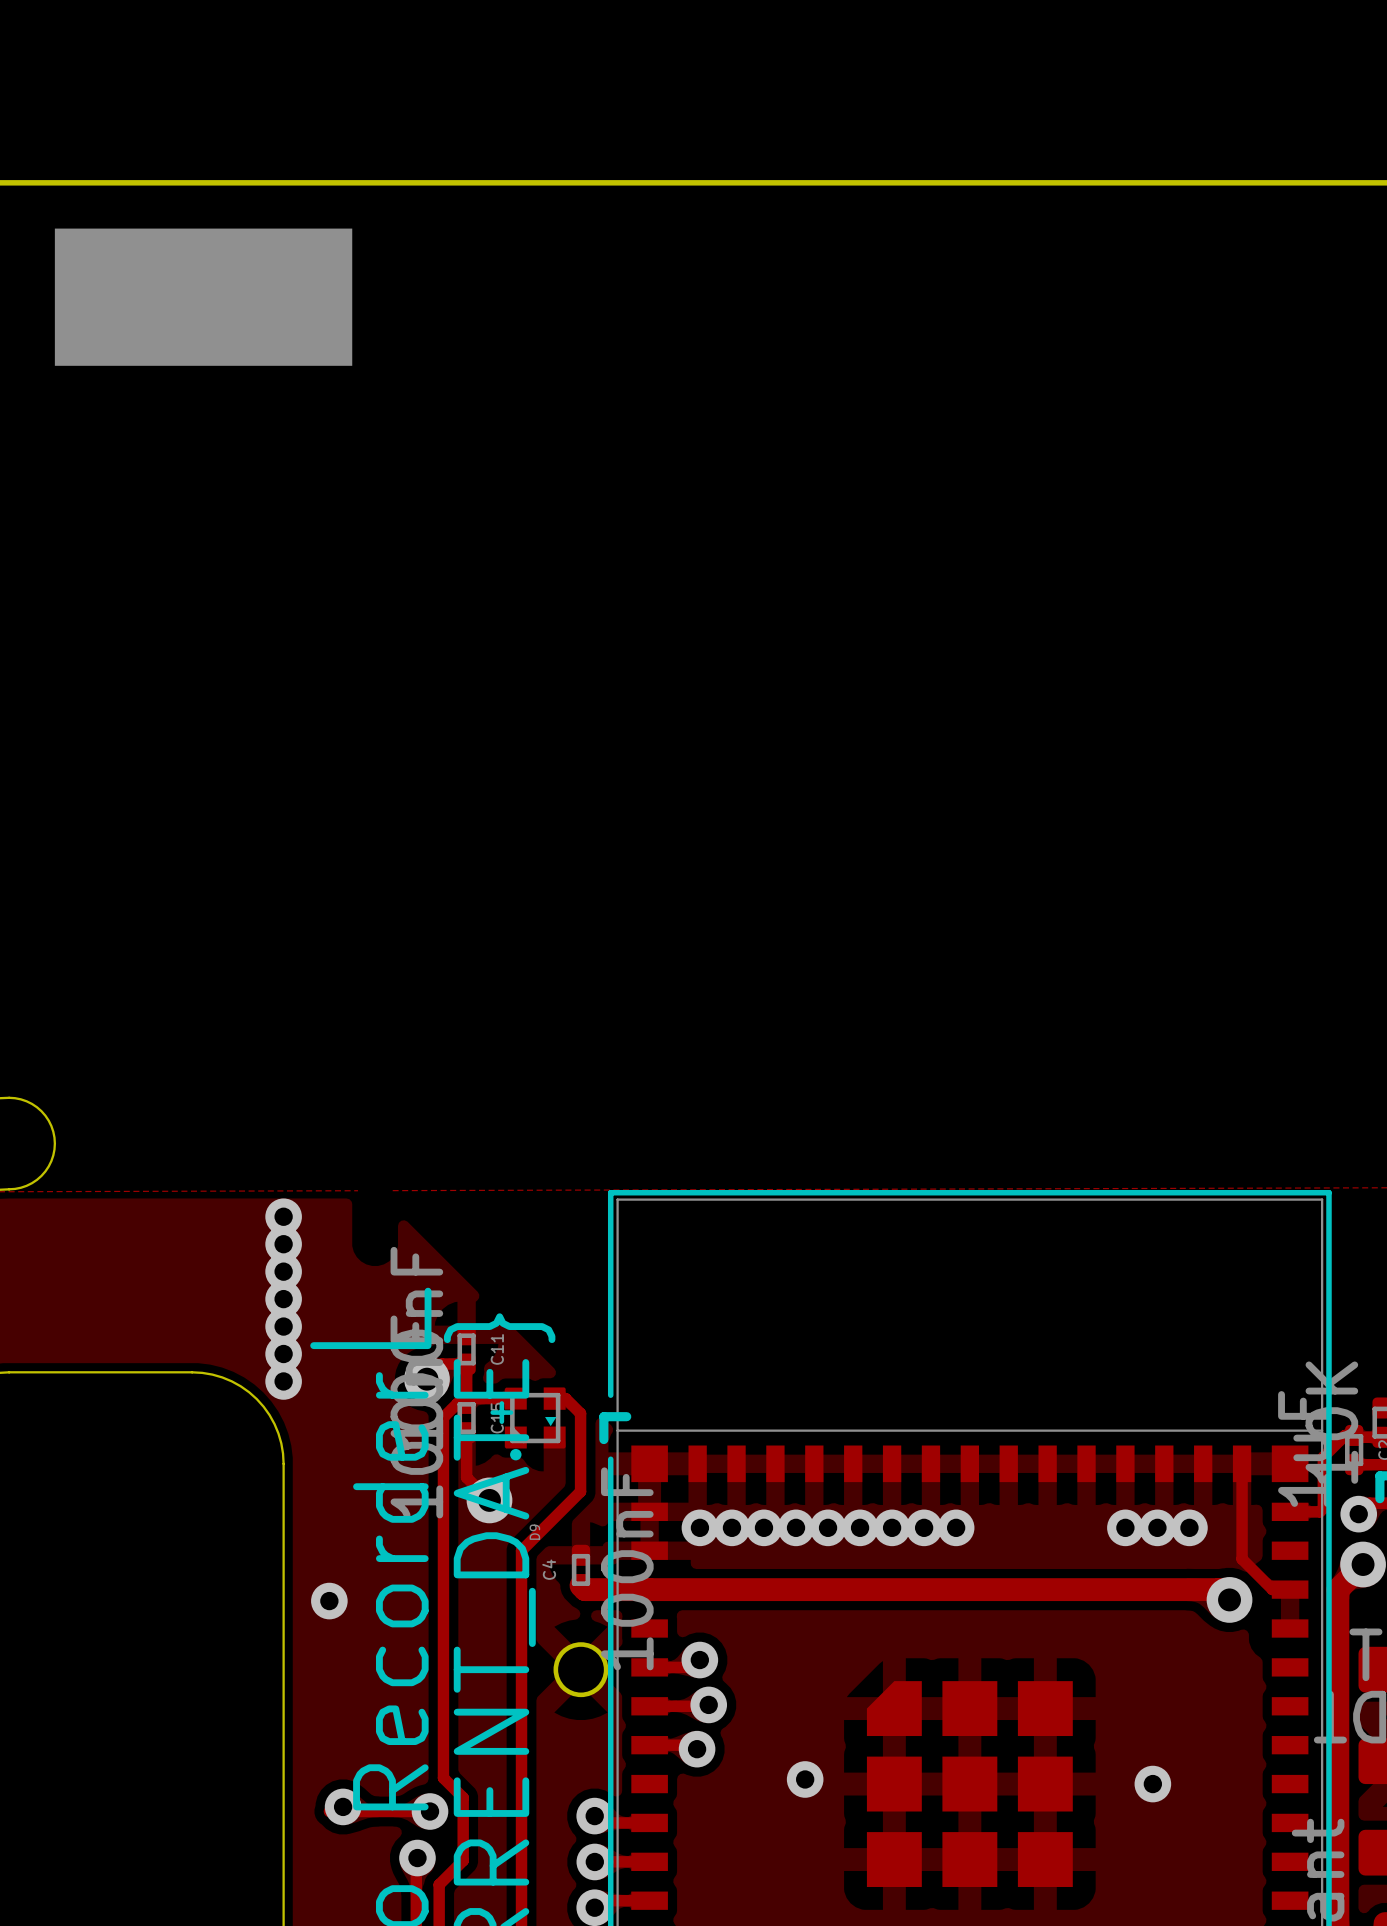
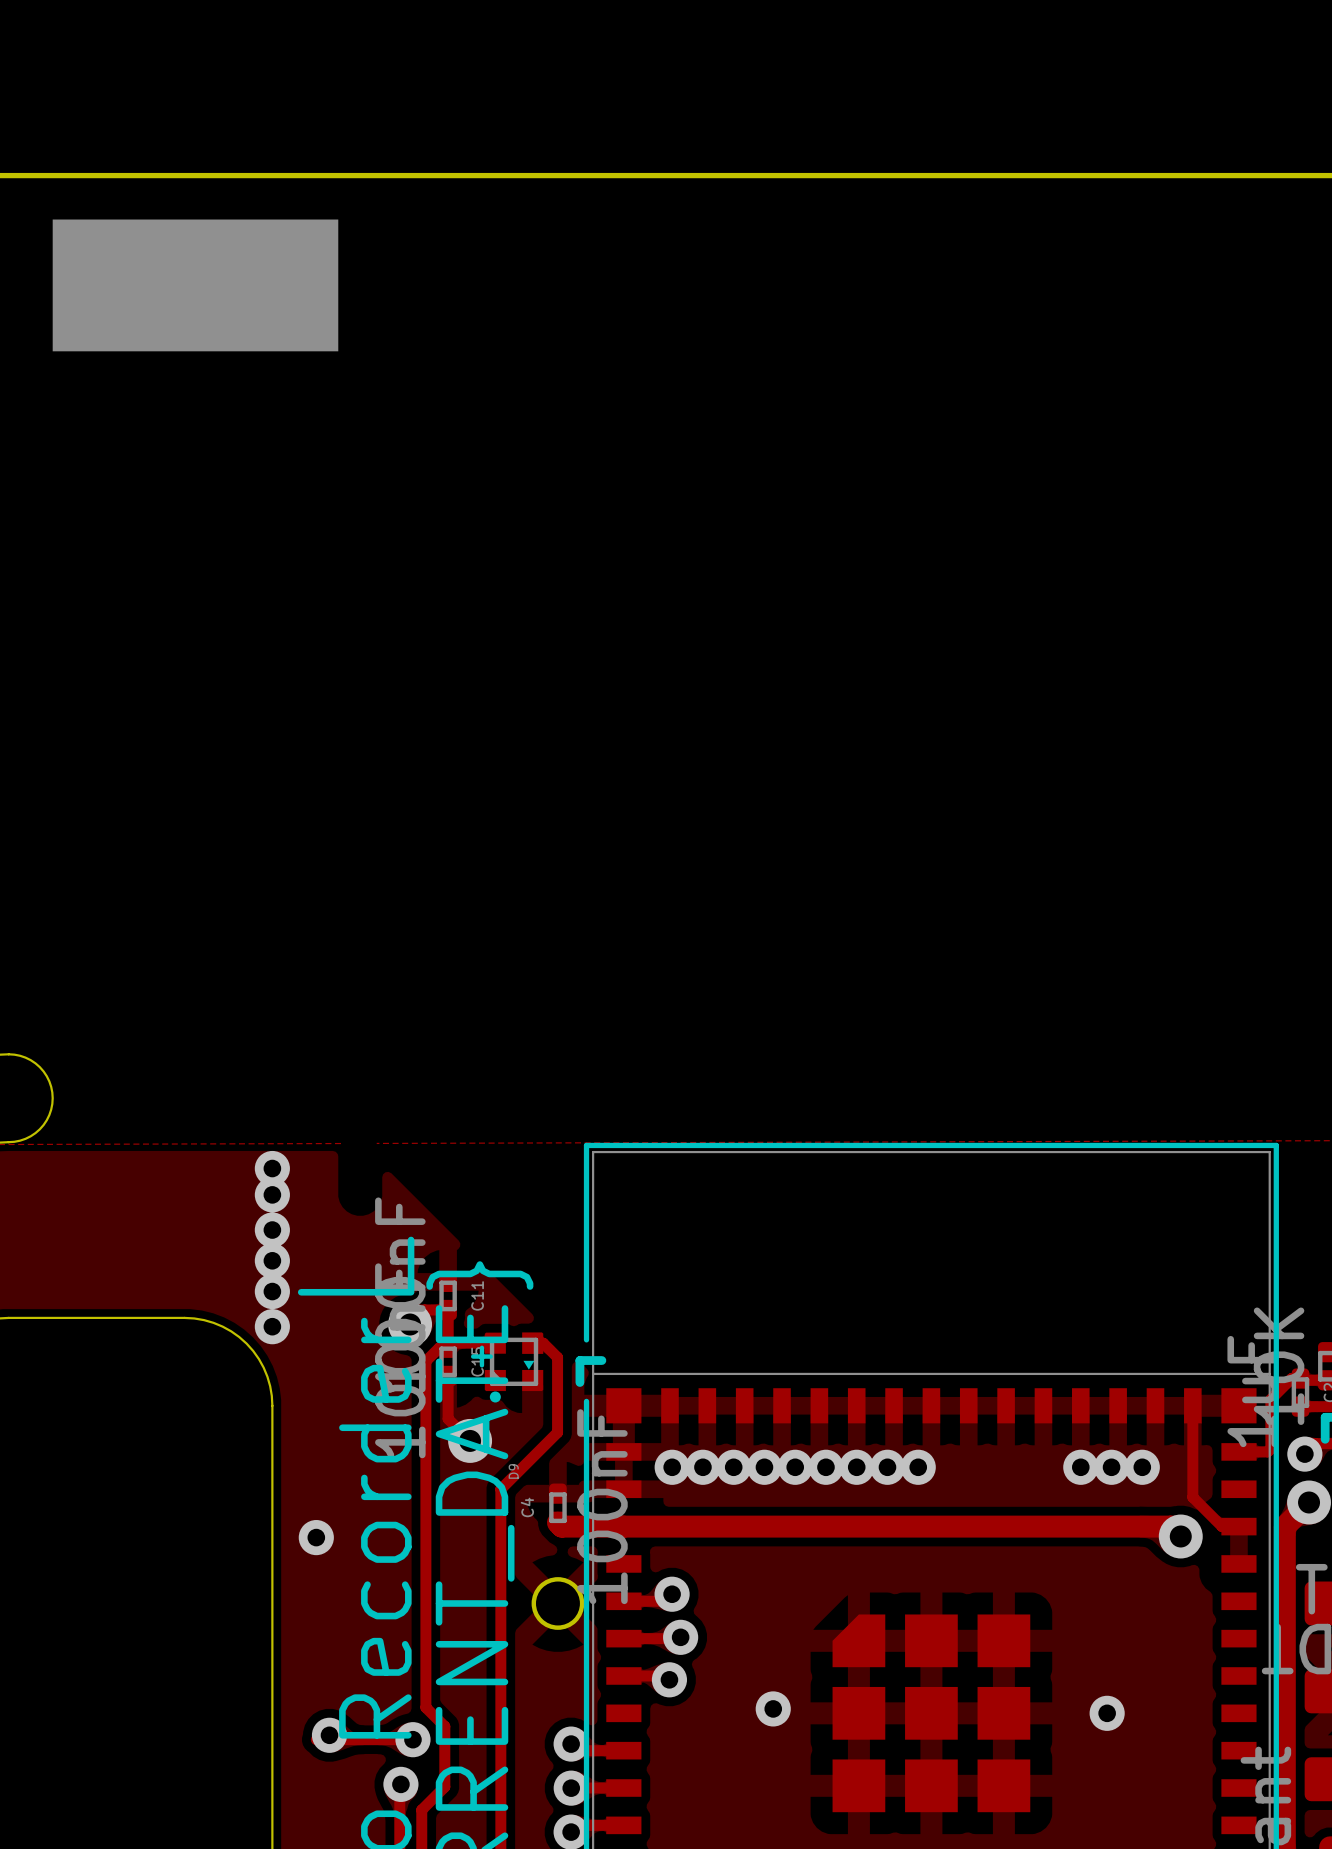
via: (283, 1271) -> none
via: none -> (272, 1230)
via: (283, 1299) -> none
via: none -> (272, 1260)
via: (283, 1326) -> none
via: none -> (272, 1291)
via: (283, 1354) -> none

